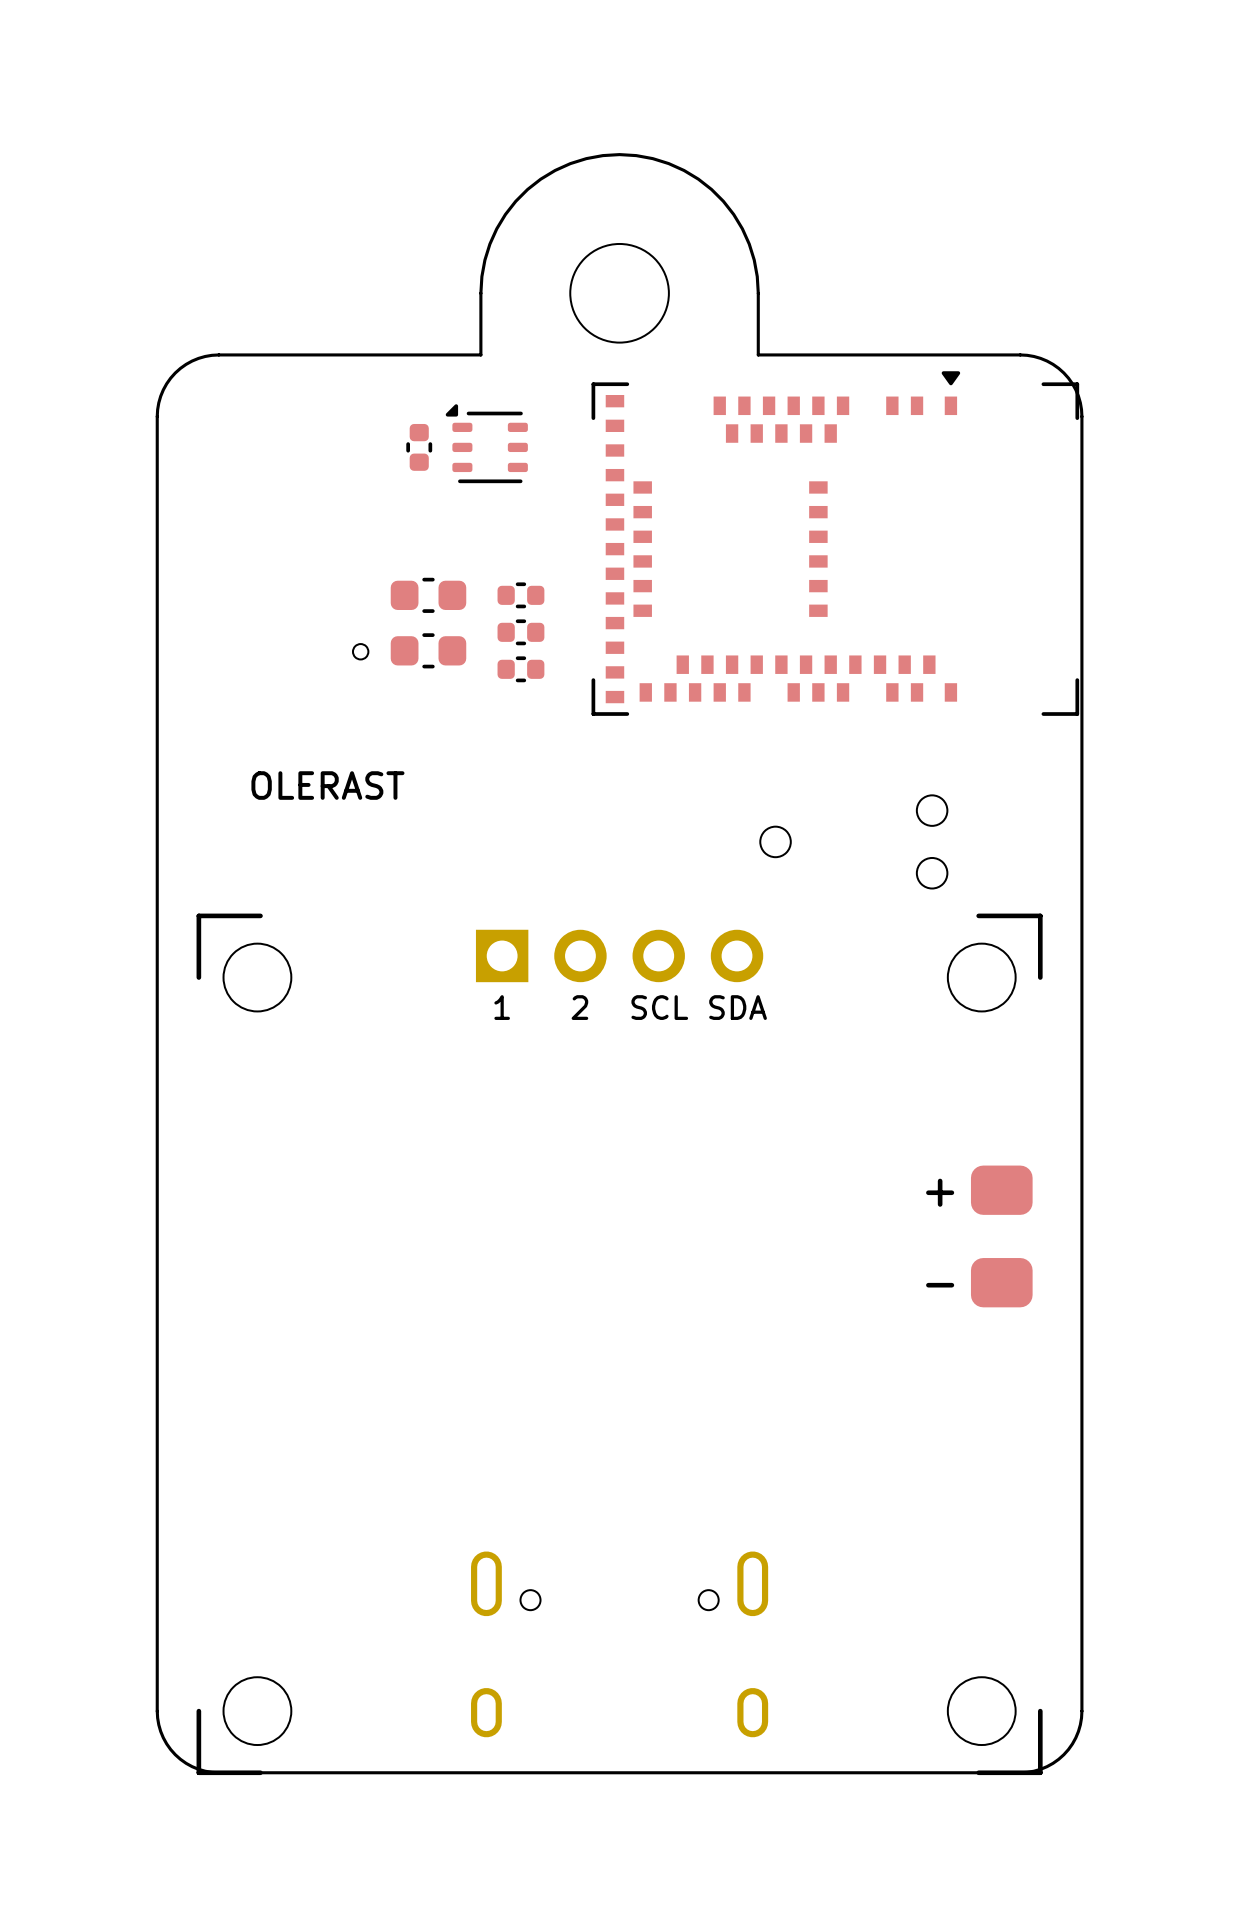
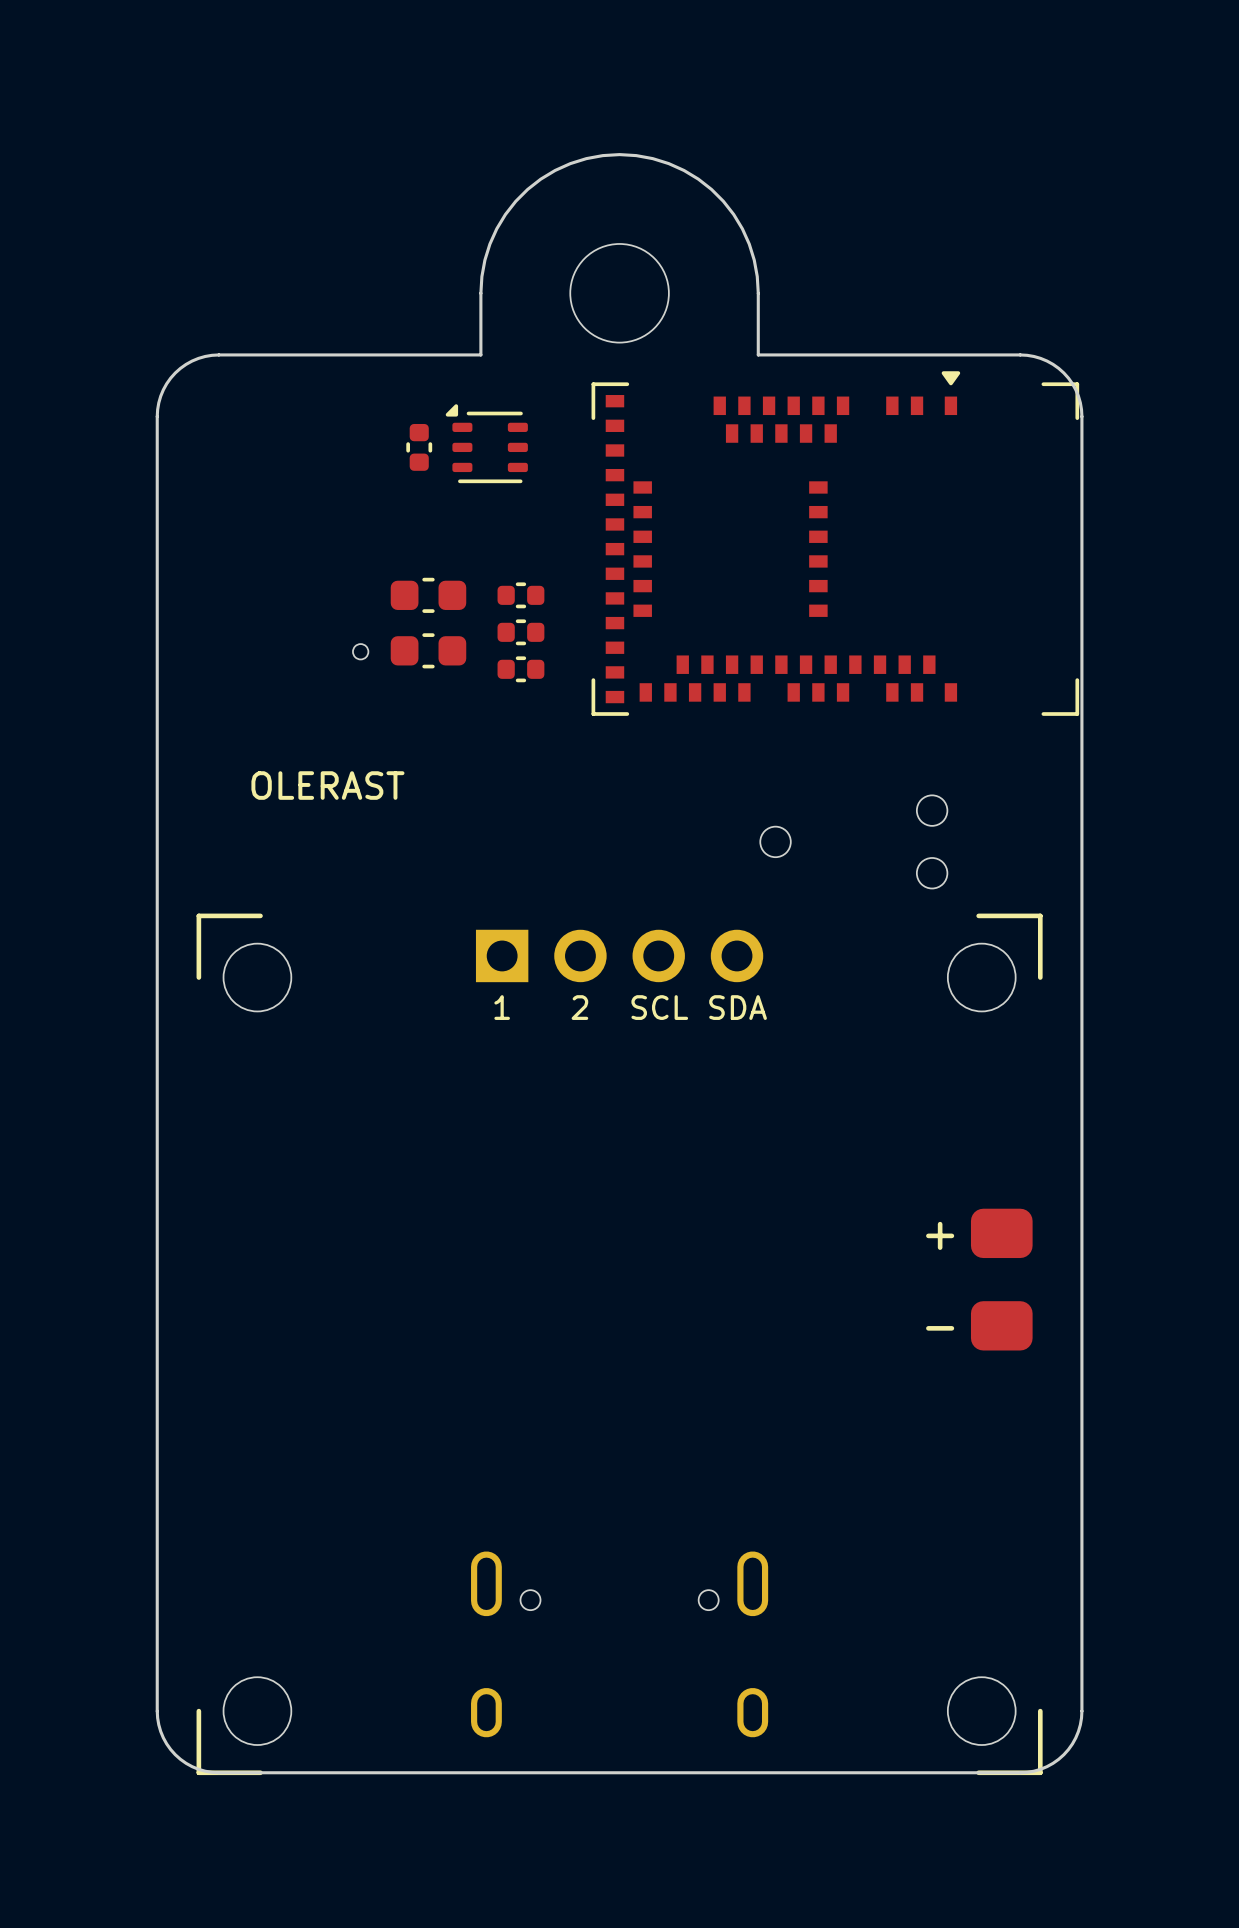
part position: (1001, 1236) -> (1001, 1279)

